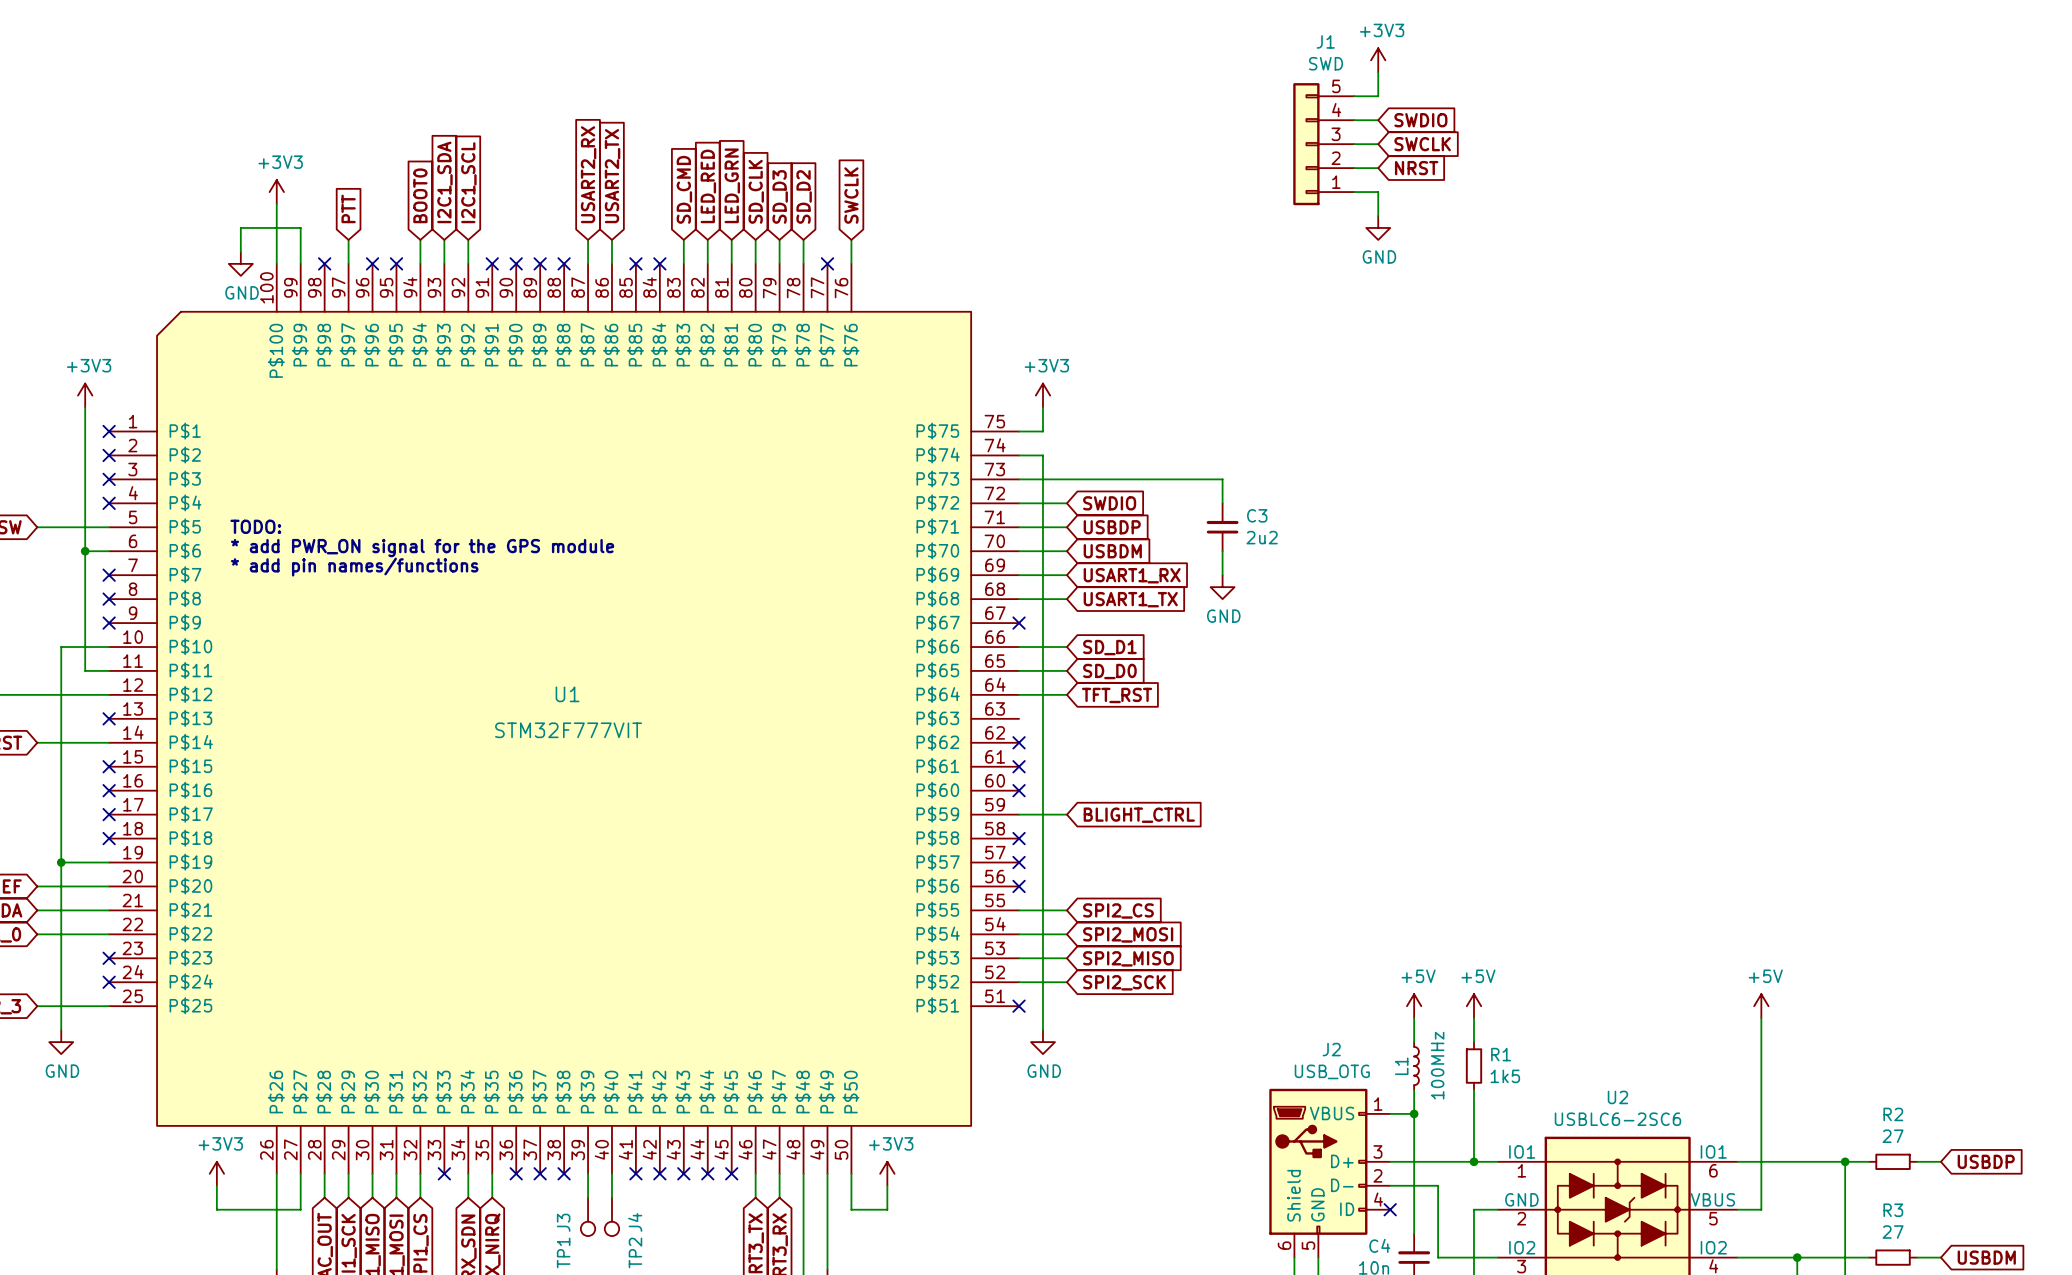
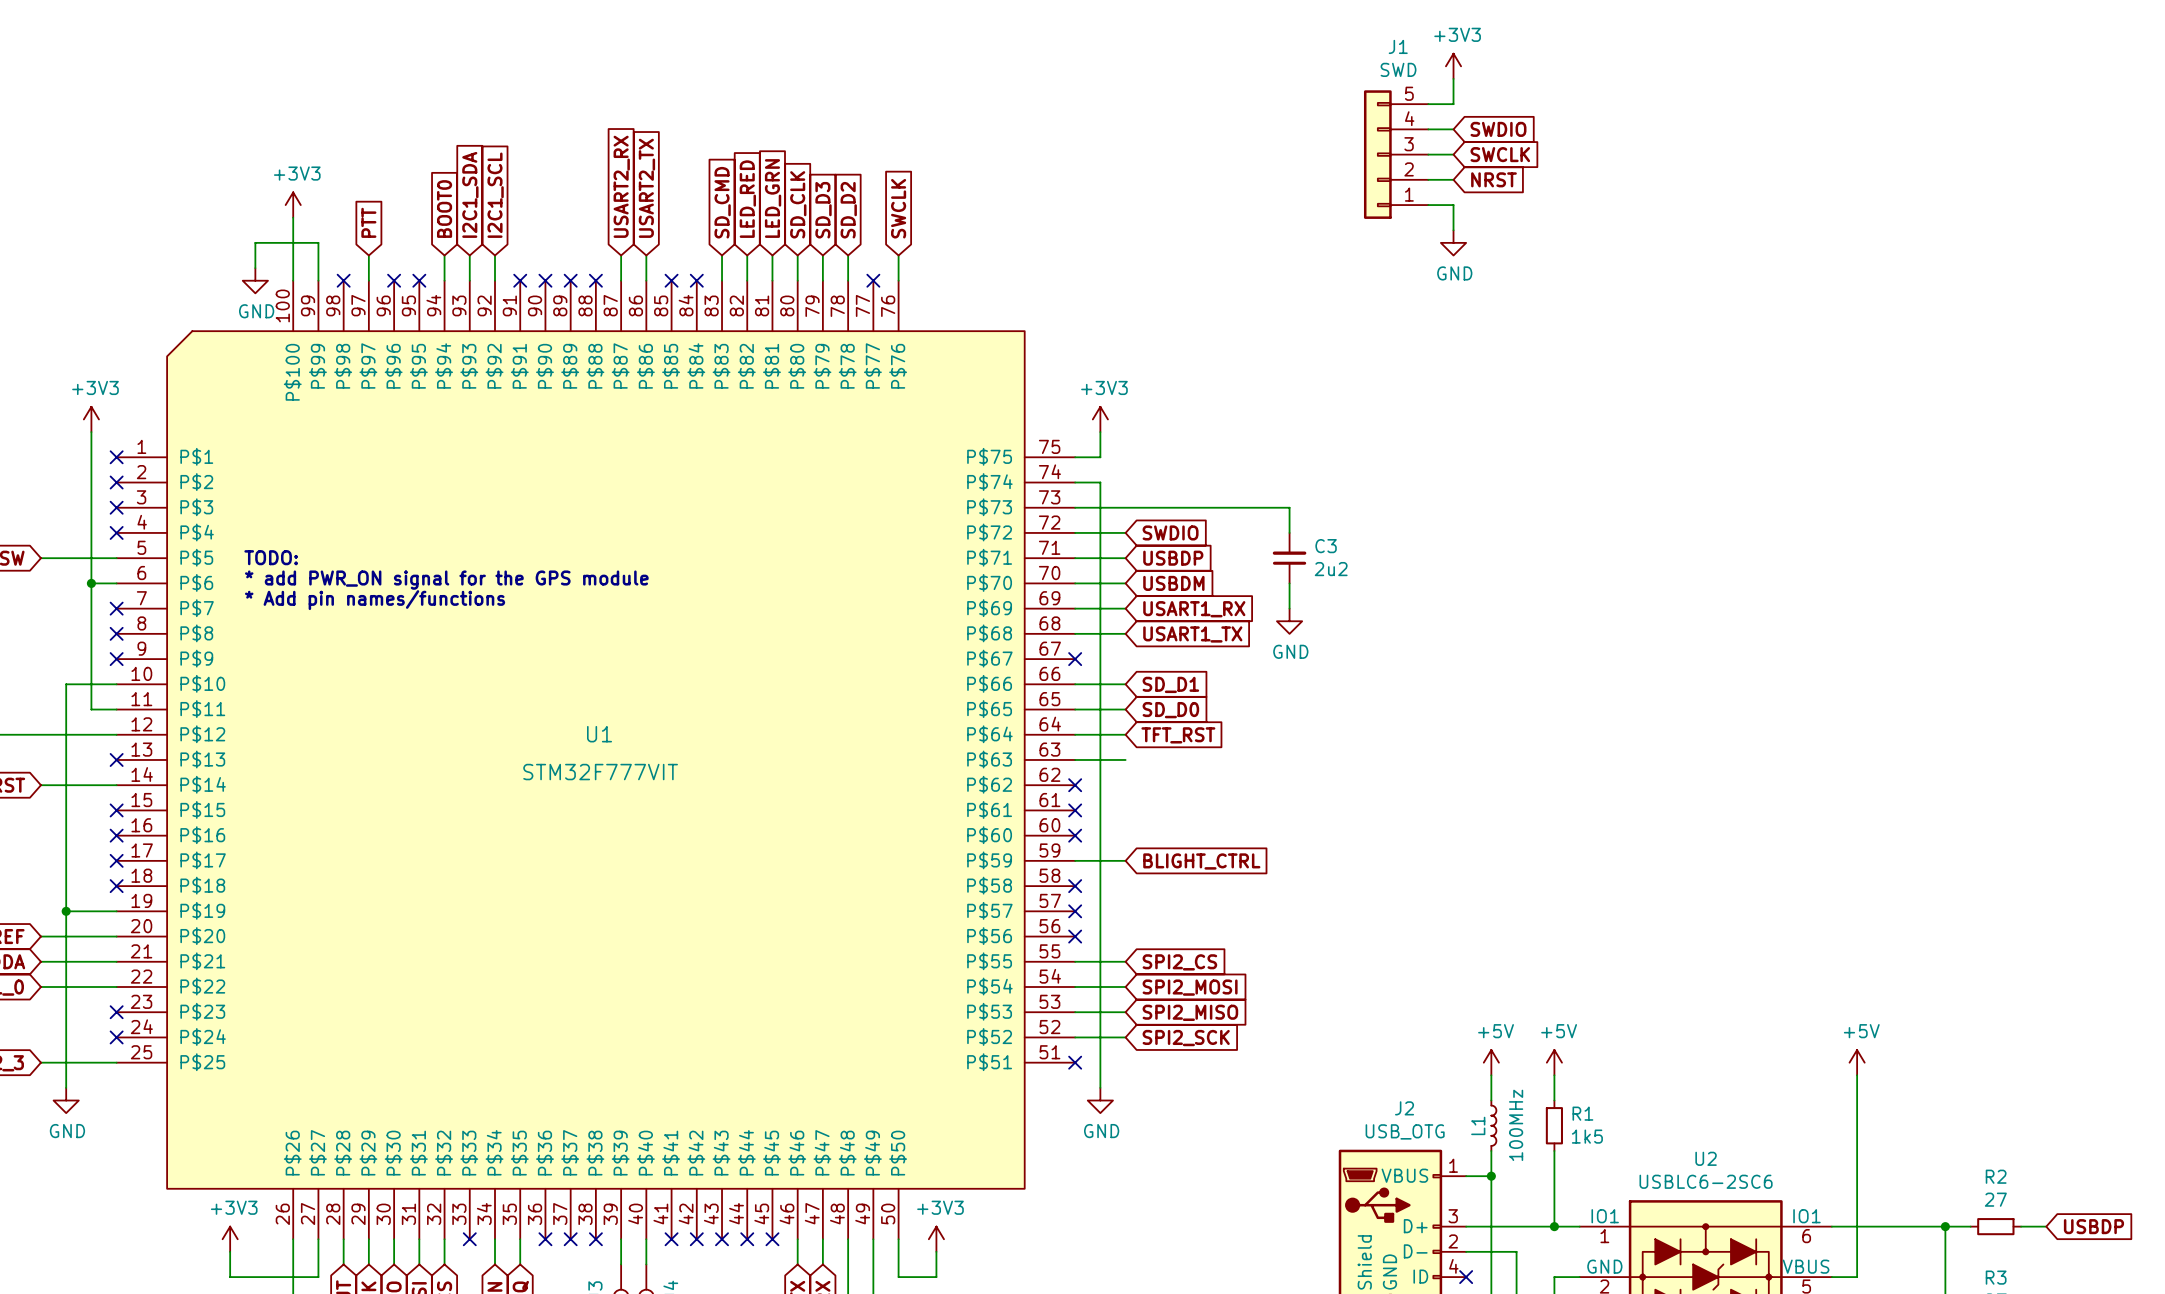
text: * add pin names/functions (354, 567) -> * Add pin names/functions (375, 600)
wire: none -> (1075, 759) (1125, 759)

